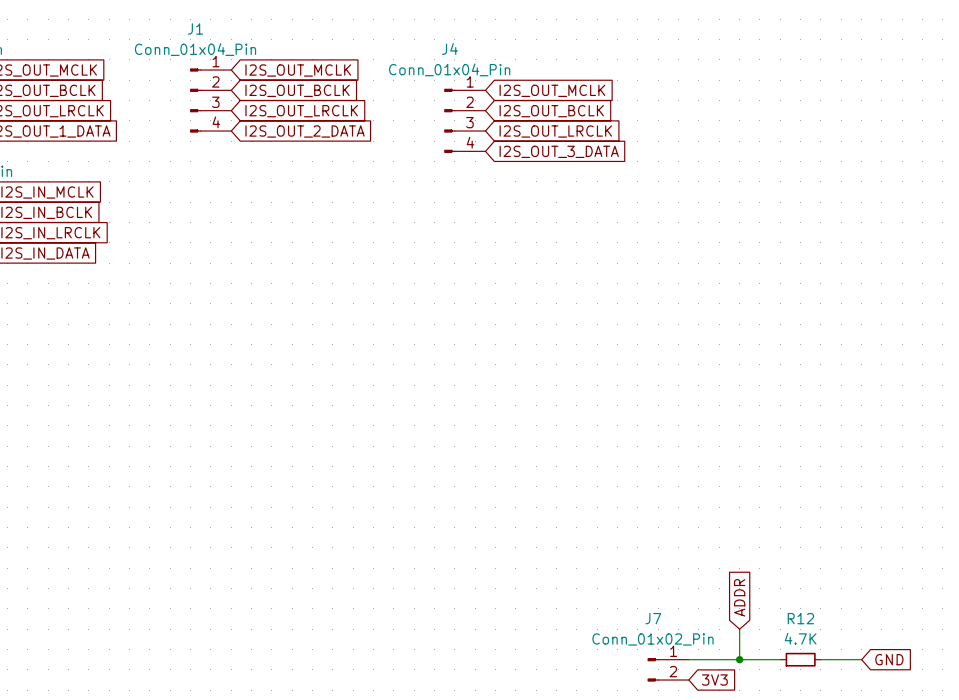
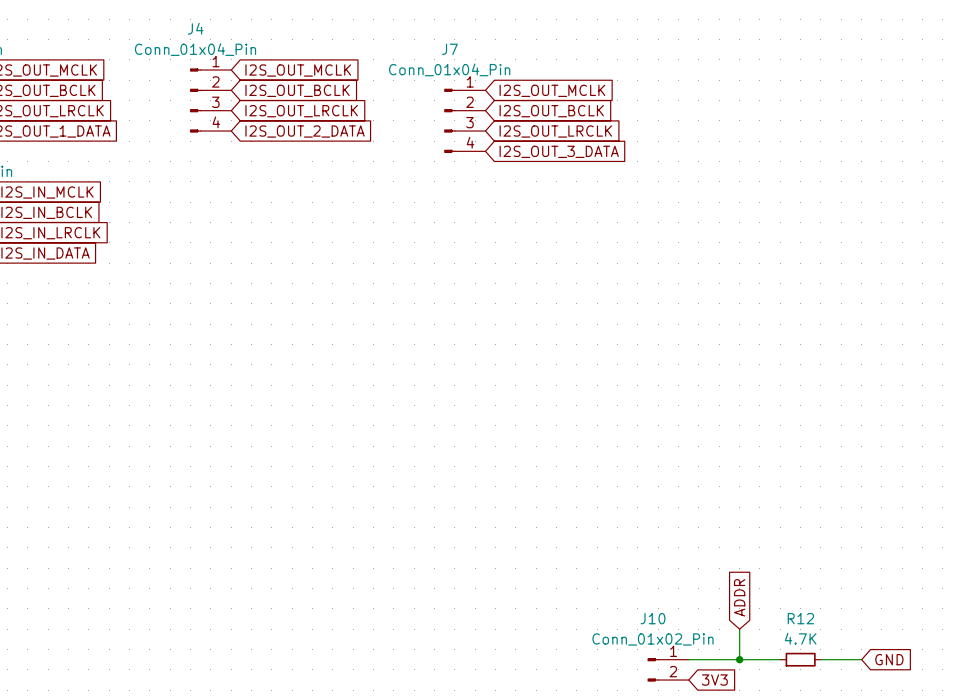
J1 name: J1 (195, 28) -> J4 (195, 28)
J4 name: J4 (449, 49) -> J7 (449, 49)
J7 name: J7 (653, 618) -> J10 (653, 618)

